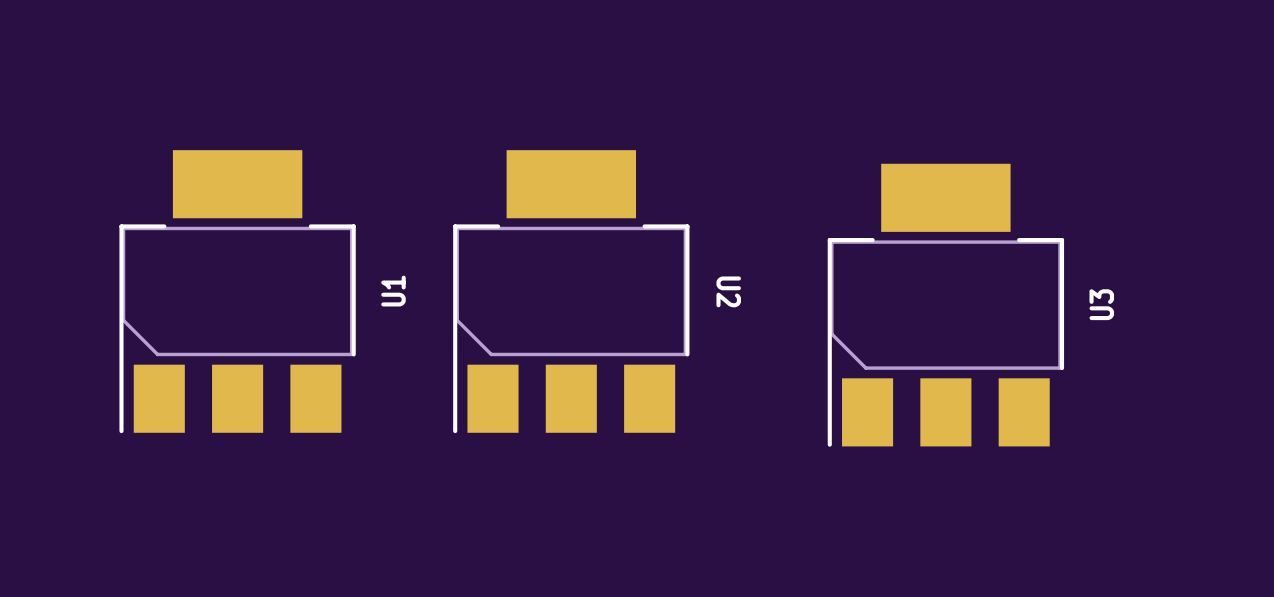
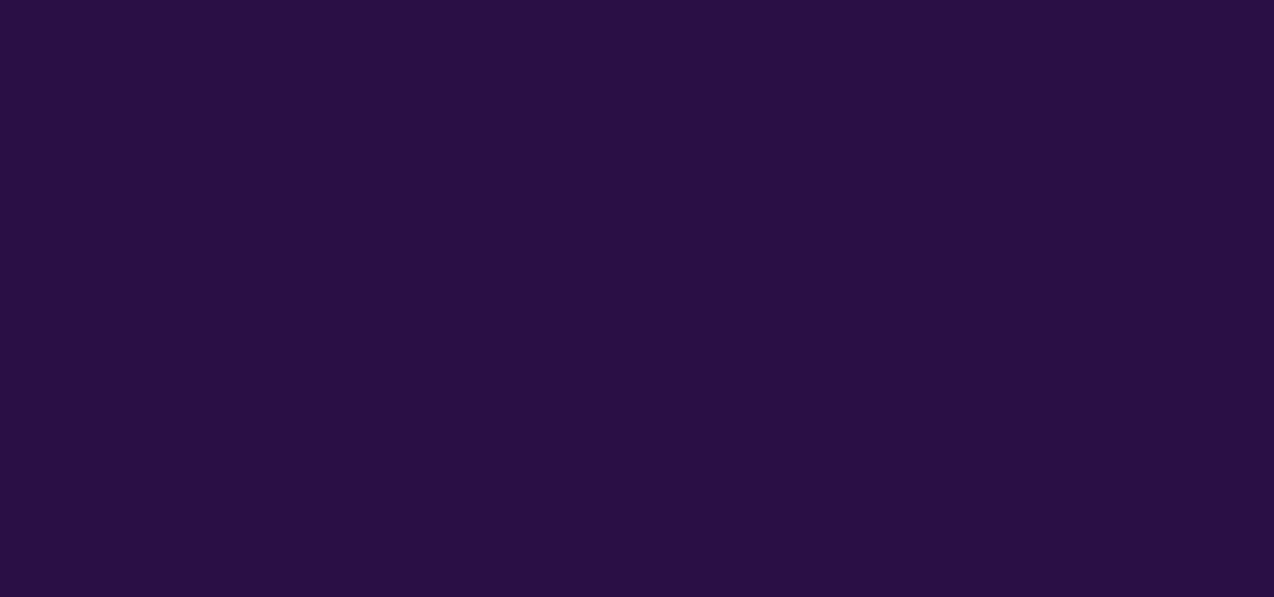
U1: (237, 291) -> none
U2: (571, 291) -> none
U3: (945, 305) -> none

